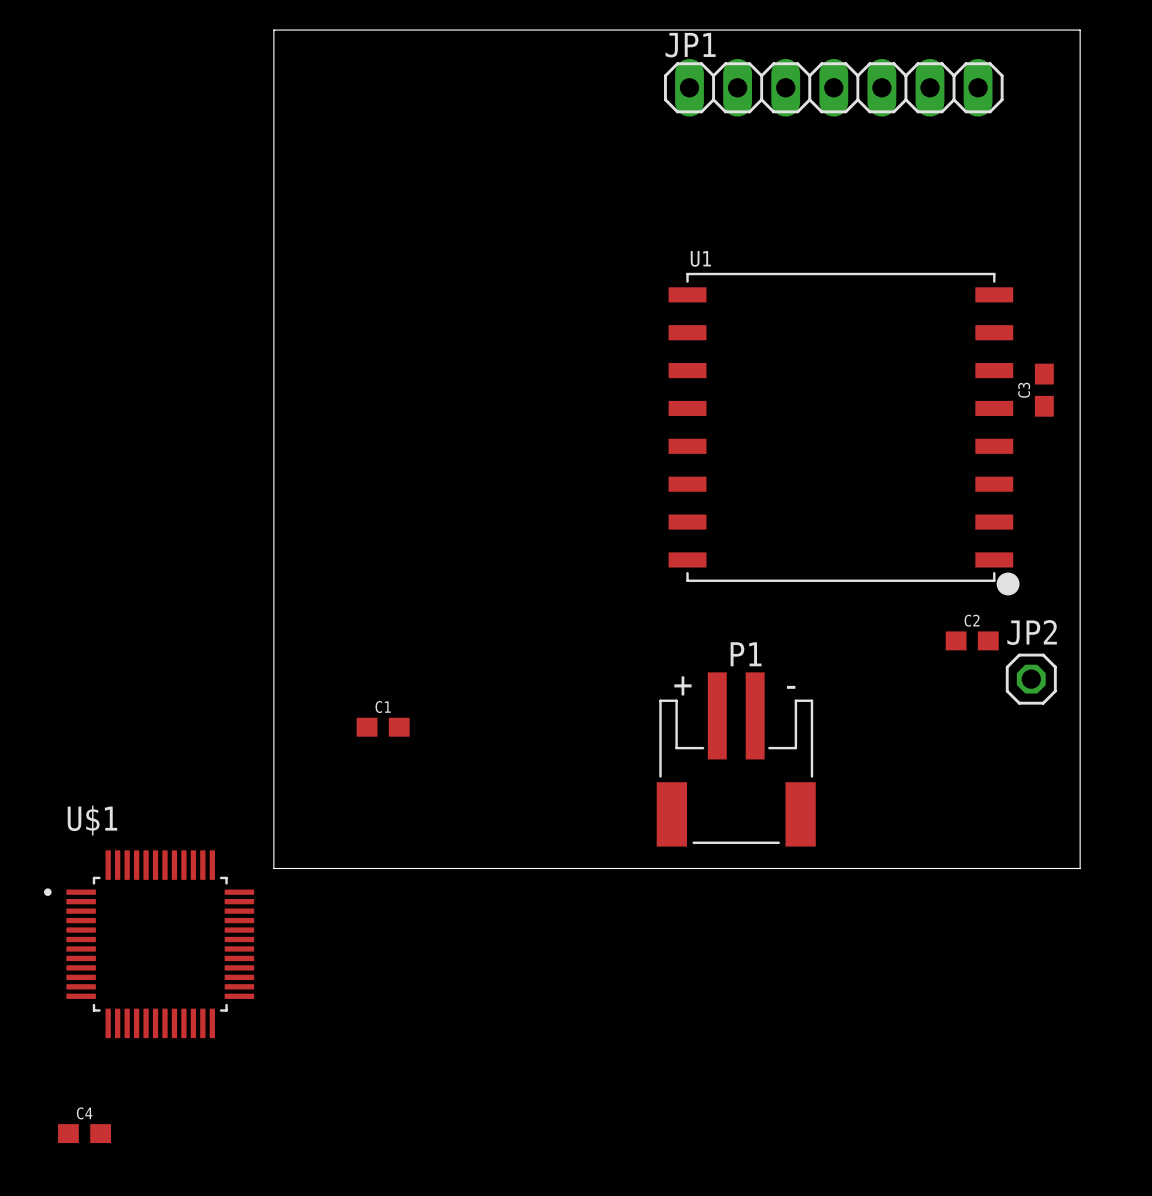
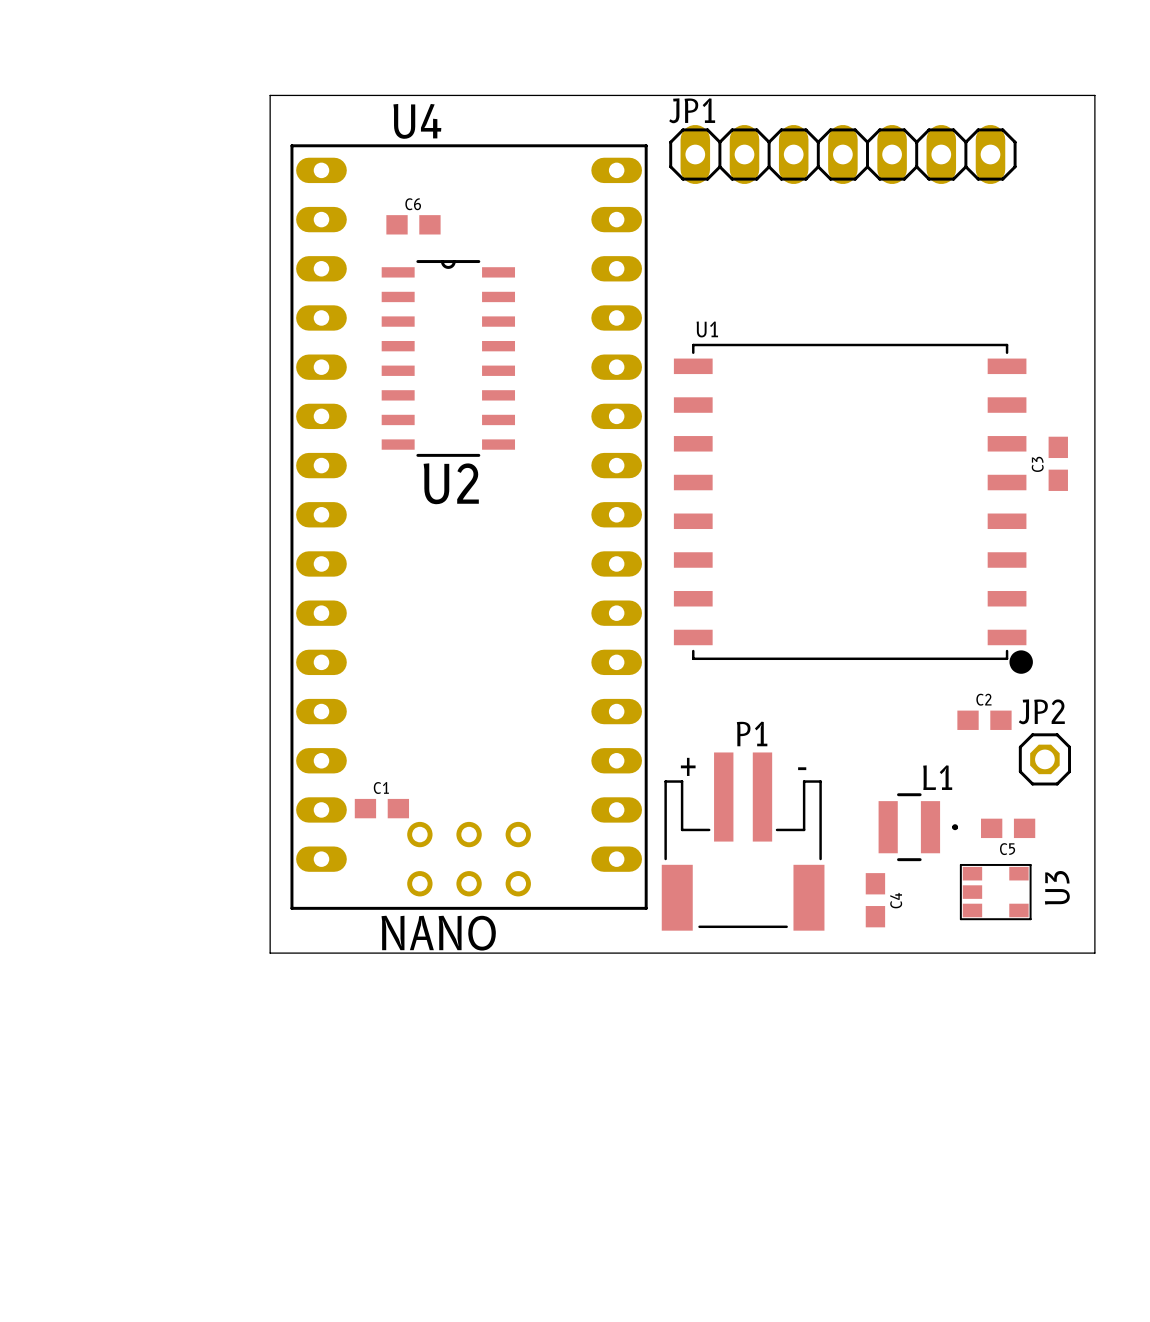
C6: none -> (413, 224)
U2: none -> (448, 358)
U4: none -> NANO (469, 527)
L1: none -> (918, 827)
C5: none -> (1008, 828)
U3: none -> (995, 892)
U$1: (149, 944) -> none
C4 rotation: 0° (84, 1133) -> 90° clockwise (875, 900)
C4 position: (84, 1133) -> (875, 900)

